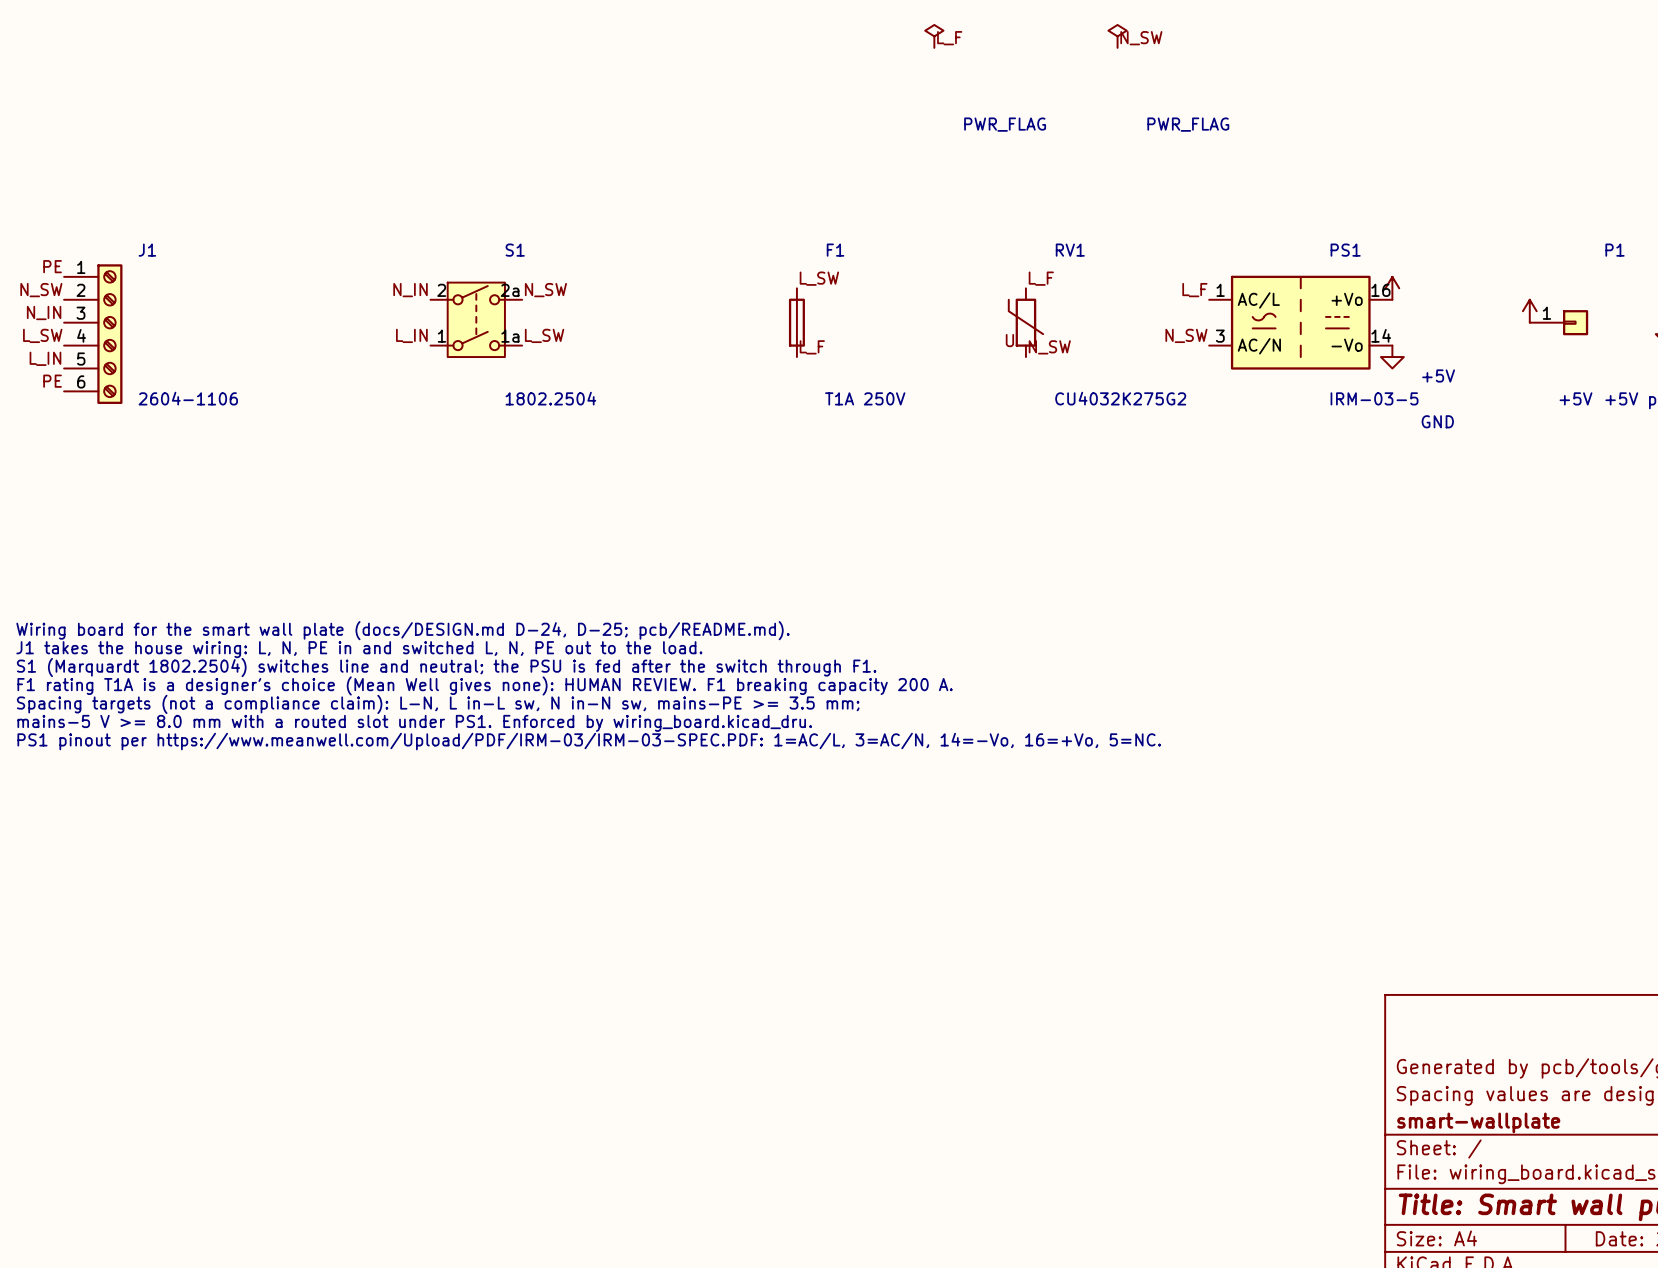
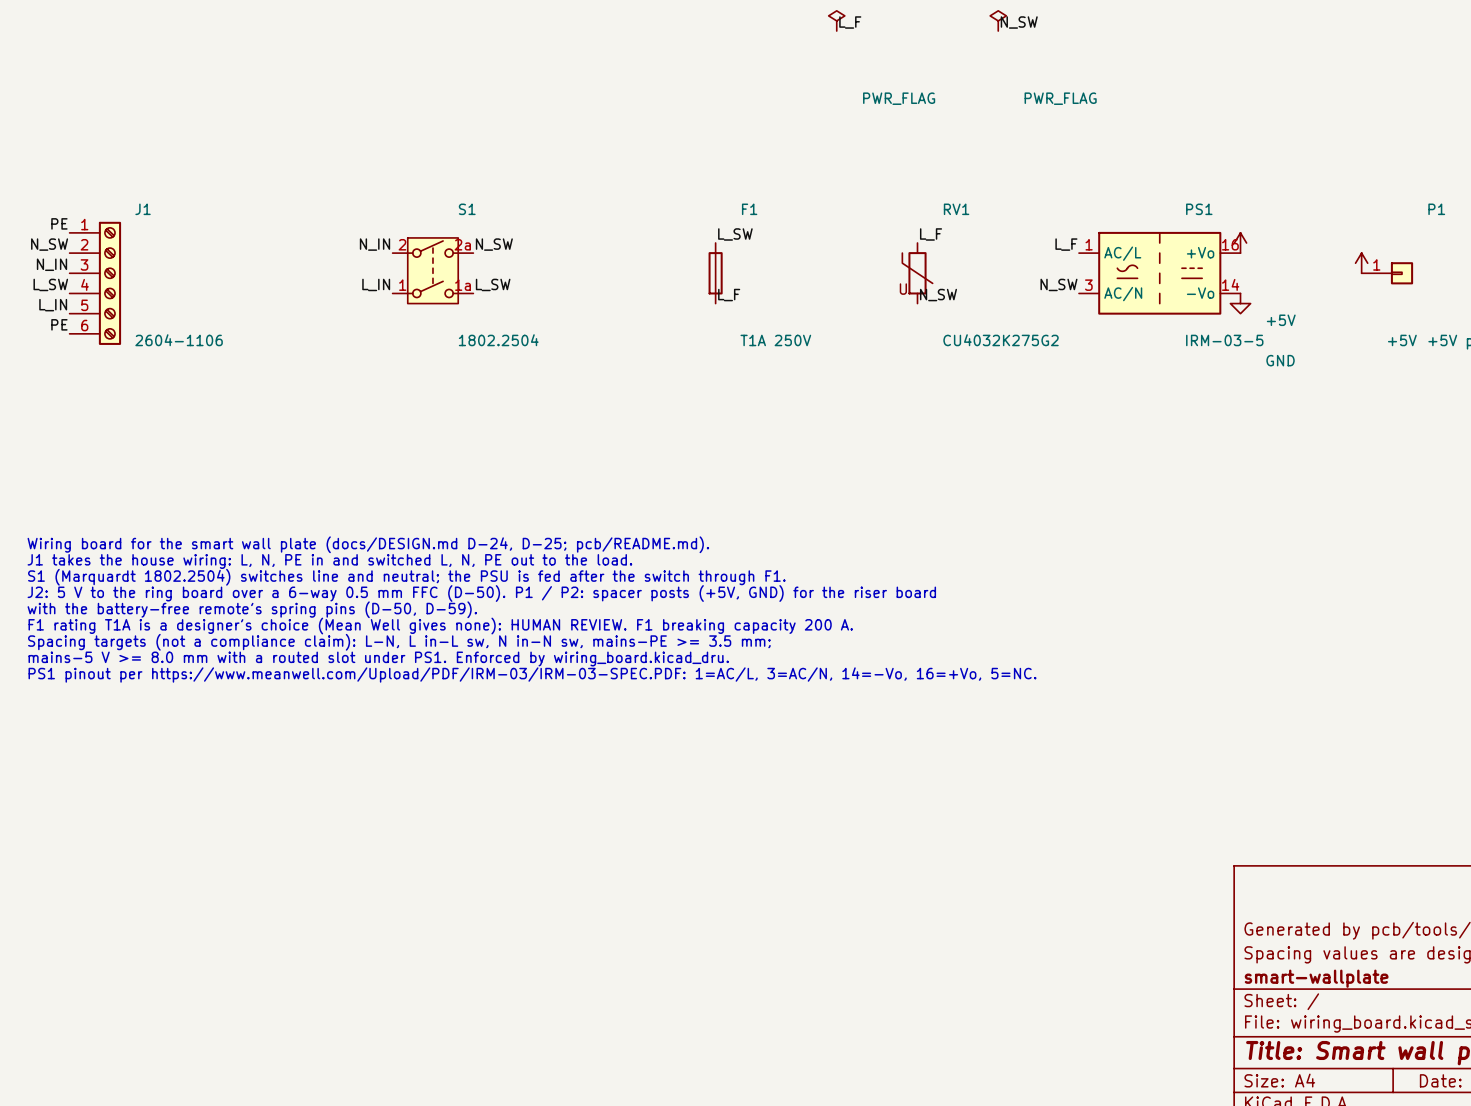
text: F1 rating T1A is a designer's choice (Mean Well gives none): HUMAN REVIEW. F1 breaking capacity 200 A. (485, 685) -> J2: 5 V to the ring board over a 6-way 0.5 mm FFC (D-50). P1 / P2: spacer posts (+5V, GND) for the riser board (481, 593)
text: Spacing targets (not a compliance claim): L-N, L in-L sw, N in-N sw, mains-PE >= 3.5 mm; (438, 704) -> with the battery-free remote's spring pins (D-50, D-59). (252, 609)
text: mains-5 V >= 8.0 mm with a routed slot under PS1. Enforced by wiring_board.kicad_dru. (414, 723) -> F1 rating T1A is a designer's choice (Mean Well gives none): HUMAN REVIEW. F1 breaking capacity 200 A. (440, 626)
text: PS1 pinout per https://www.meanwell.com/Upload/PDF/IRM-03/IRM-03-SPEC.PDF: 1=AC/L, 3=AC/N, 14=-Vo, 16=+Vo, 5=NC. (589, 741) -> Spacing targets (not a compliance claim): L-N, L in-L sw, N in-N sw, mains-PE >= 3.5 mm; (399, 642)
text: none -> mains-5 V >= 8.0 mm with a routed slot under PS1. Enforced by wiring_board.kicad_dru. (378, 659)
text: none -> PS1 pinout per https://www.meanwell.com/Upload/PDF/IRM-03/IRM-03-SPEC.PDF: 1=AC/L, 3=AC/N, 14=-Vo, 16=+Vo, 5=NC. (532, 675)

